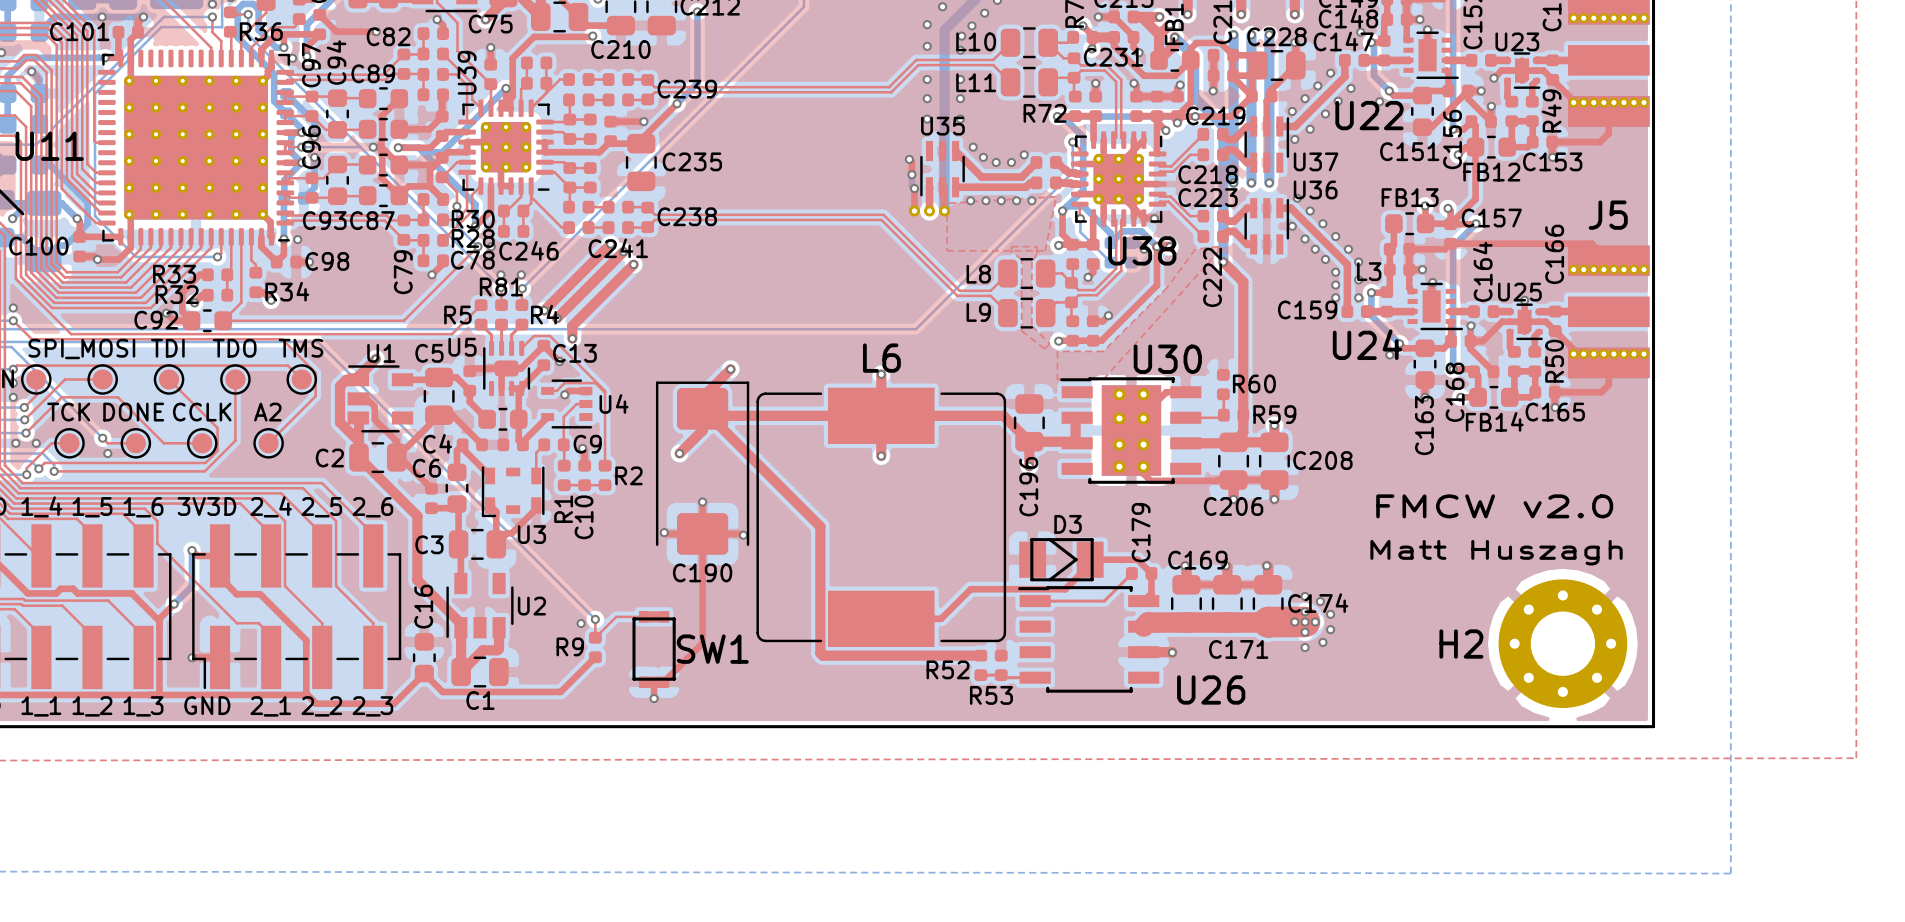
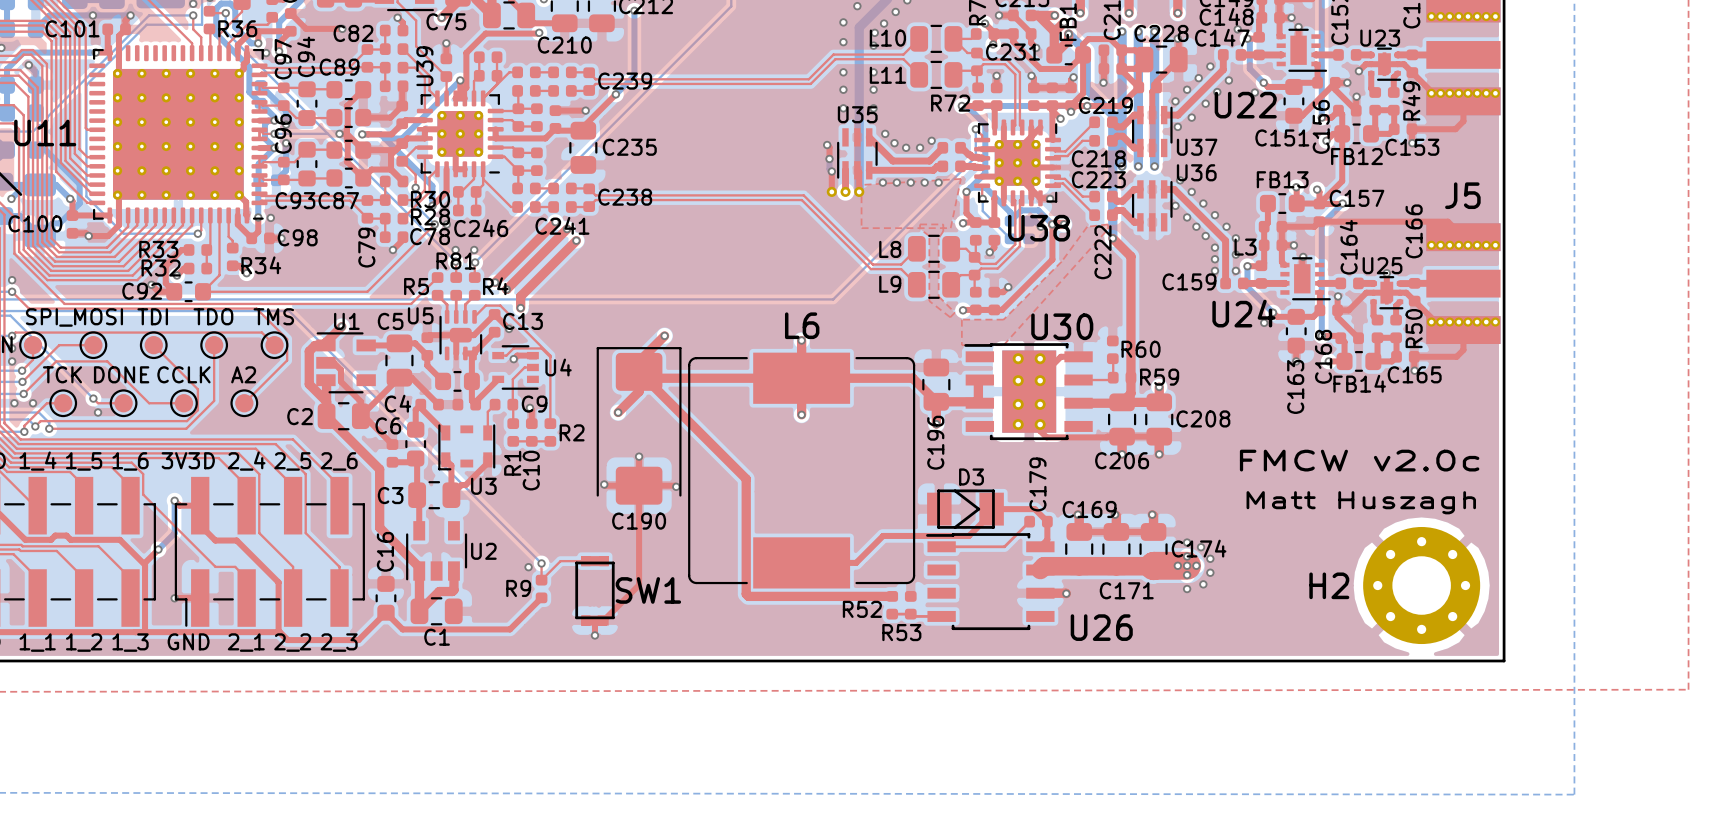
text: FMCW v2.0 (1494, 506) -> FMCW v2.0c (1359, 460)

